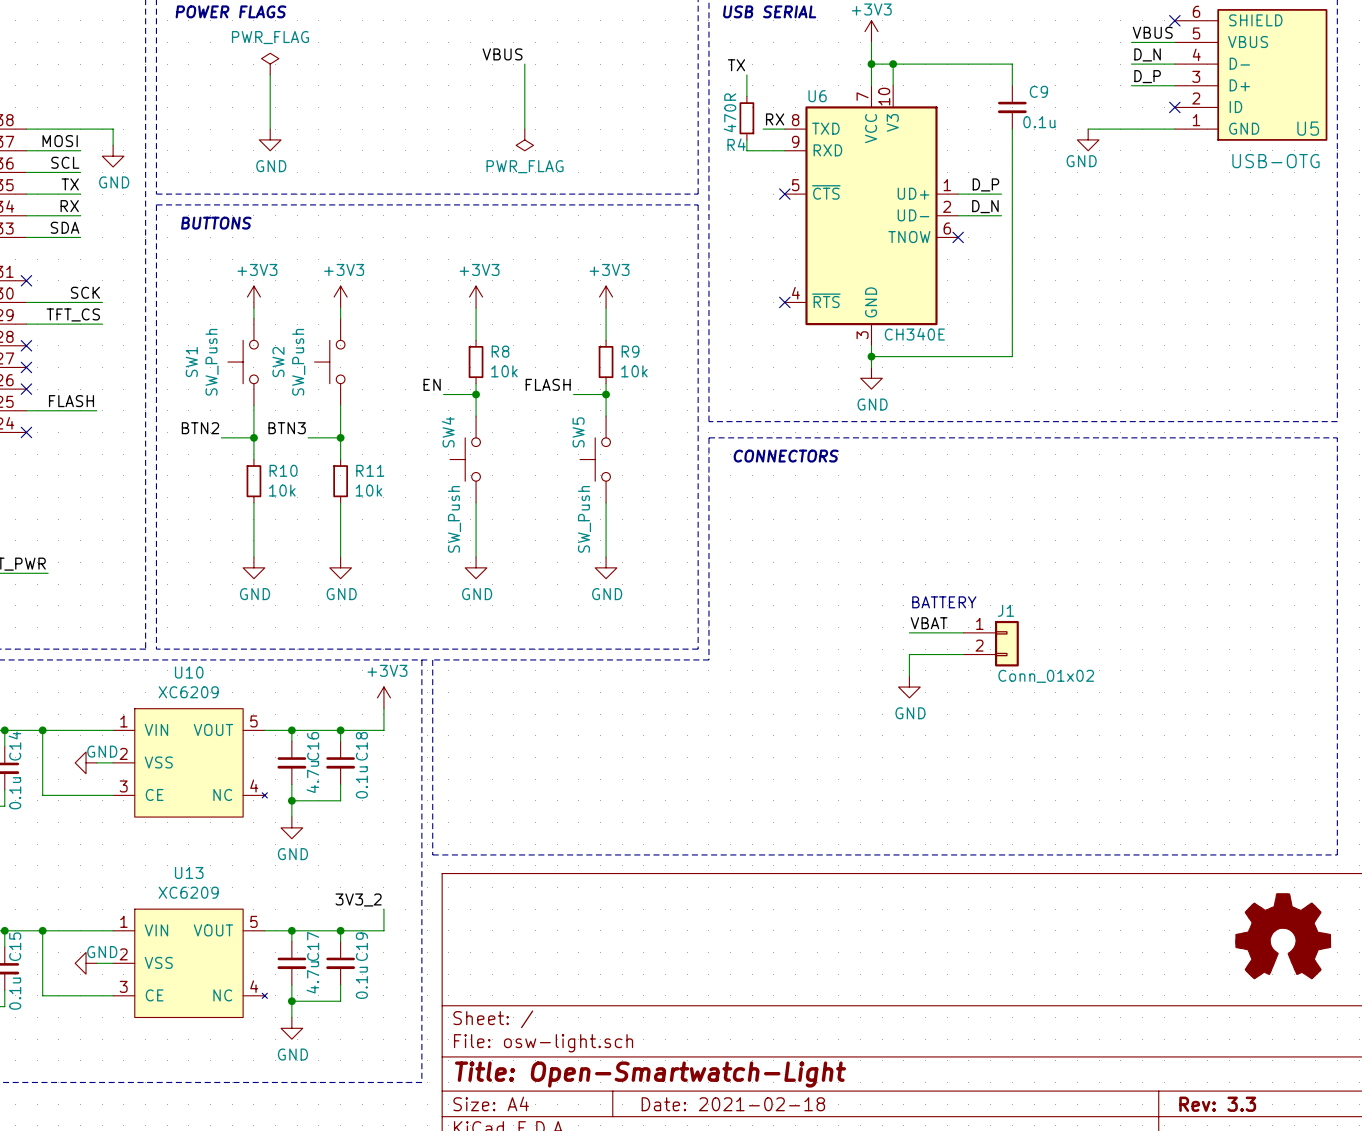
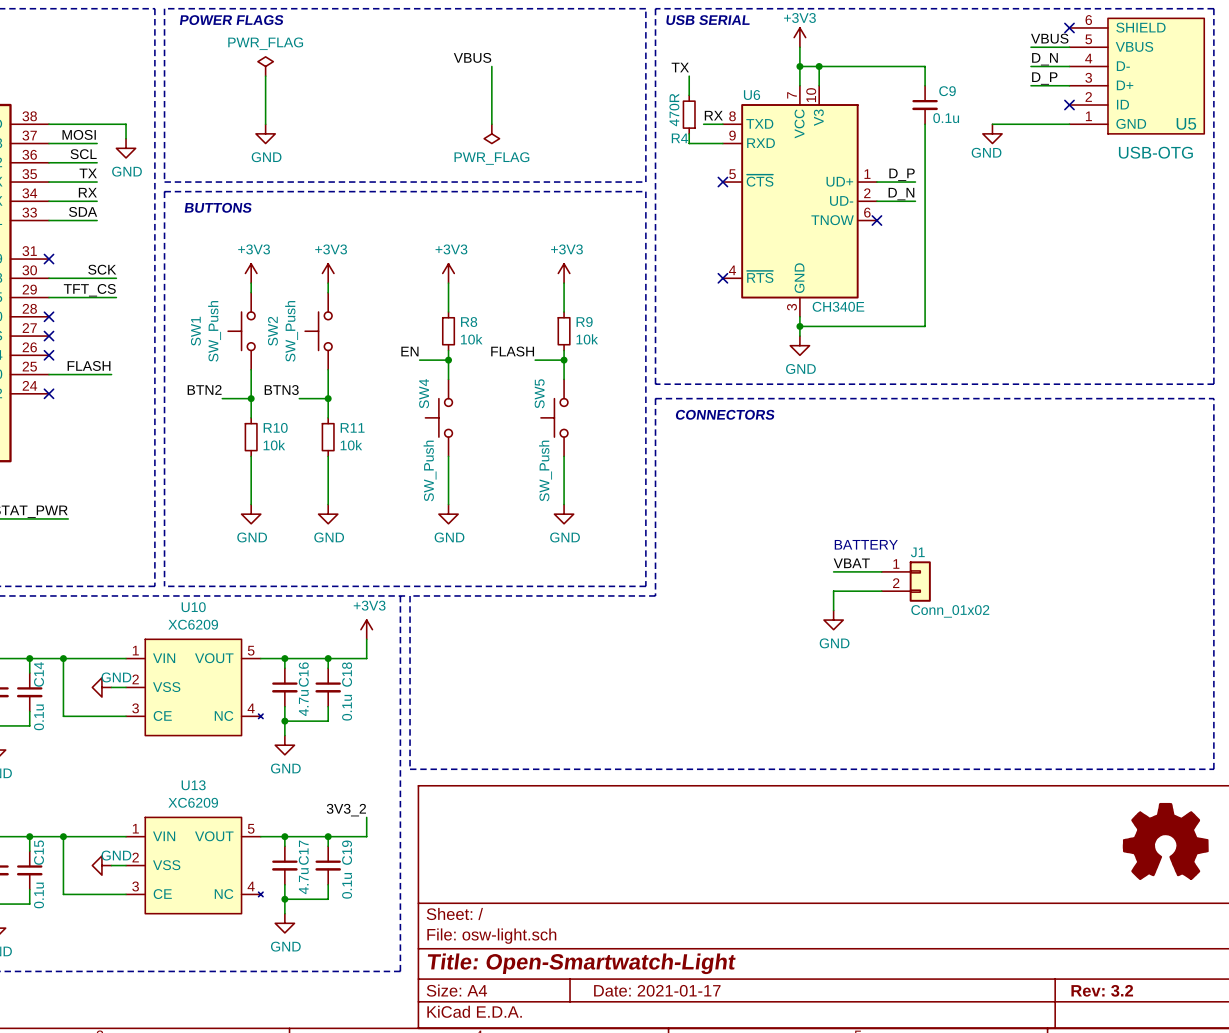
title block: Date: 2021-02-18 (733, 1104) -> Date: 2021-01-17 (657, 990)
title block: Rev: 3.3 (1217, 1104) -> Rev: 3.2 (1102, 990)

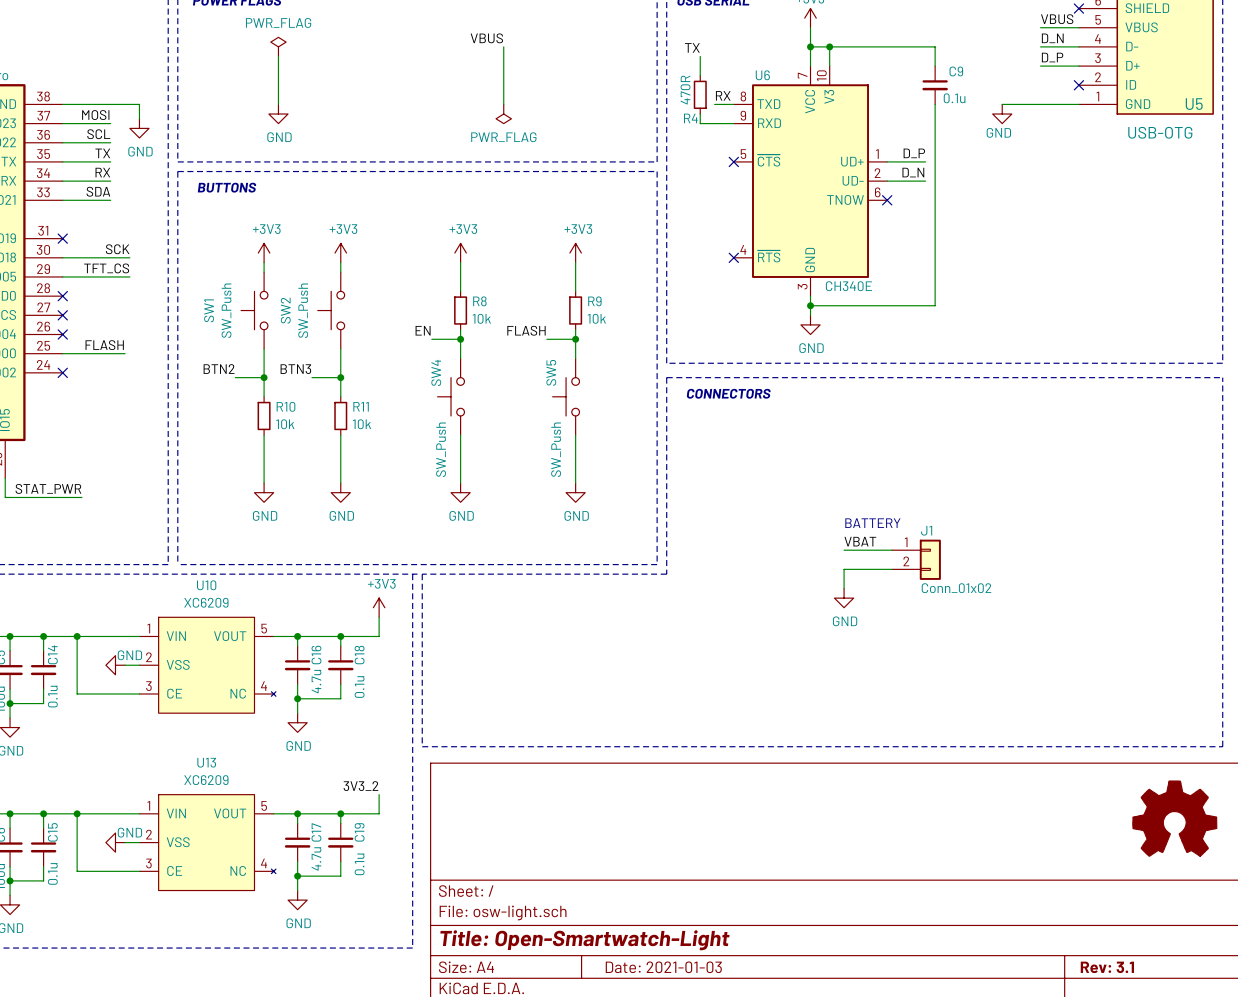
title block: Date: 2021-01-17 (657, 990) -> Date: 2021-01-03 (663, 967)
title block: Rev: 3.2 (1102, 990) -> Rev: 3.1 (1107, 967)

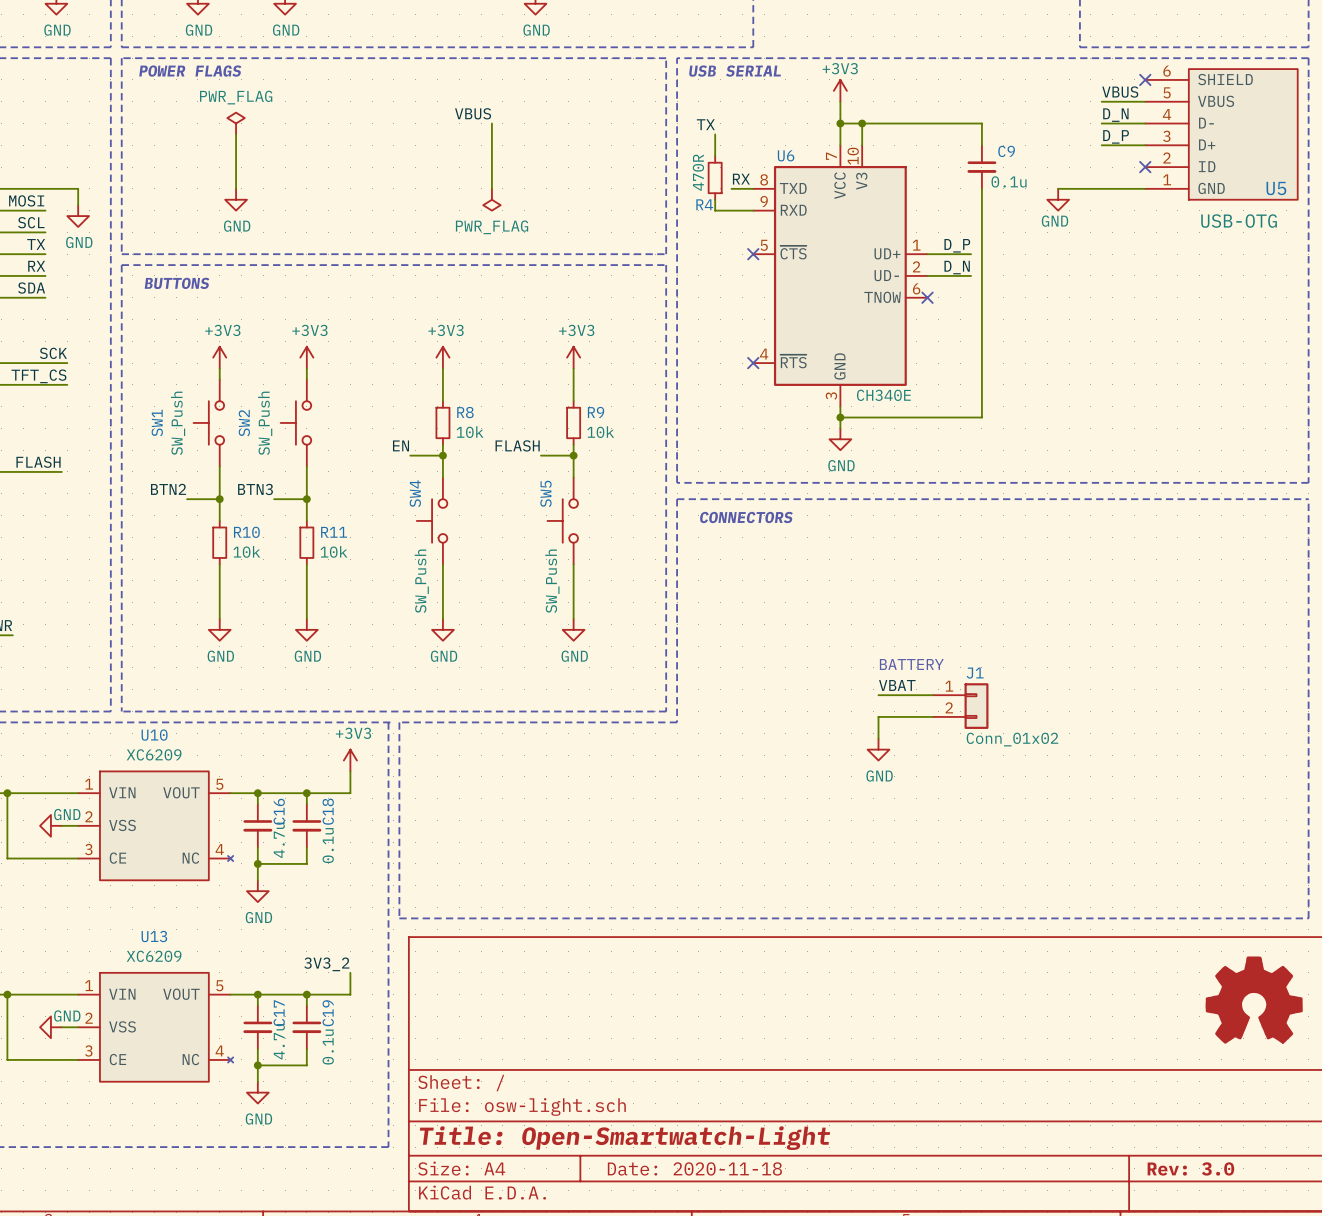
title block: Date: 2021-01-03 (663, 967) -> Date: 2020-11-18 (694, 1168)
title block: Rev: 3.1 (1107, 967) -> Rev: 3.0 (1190, 1168)

